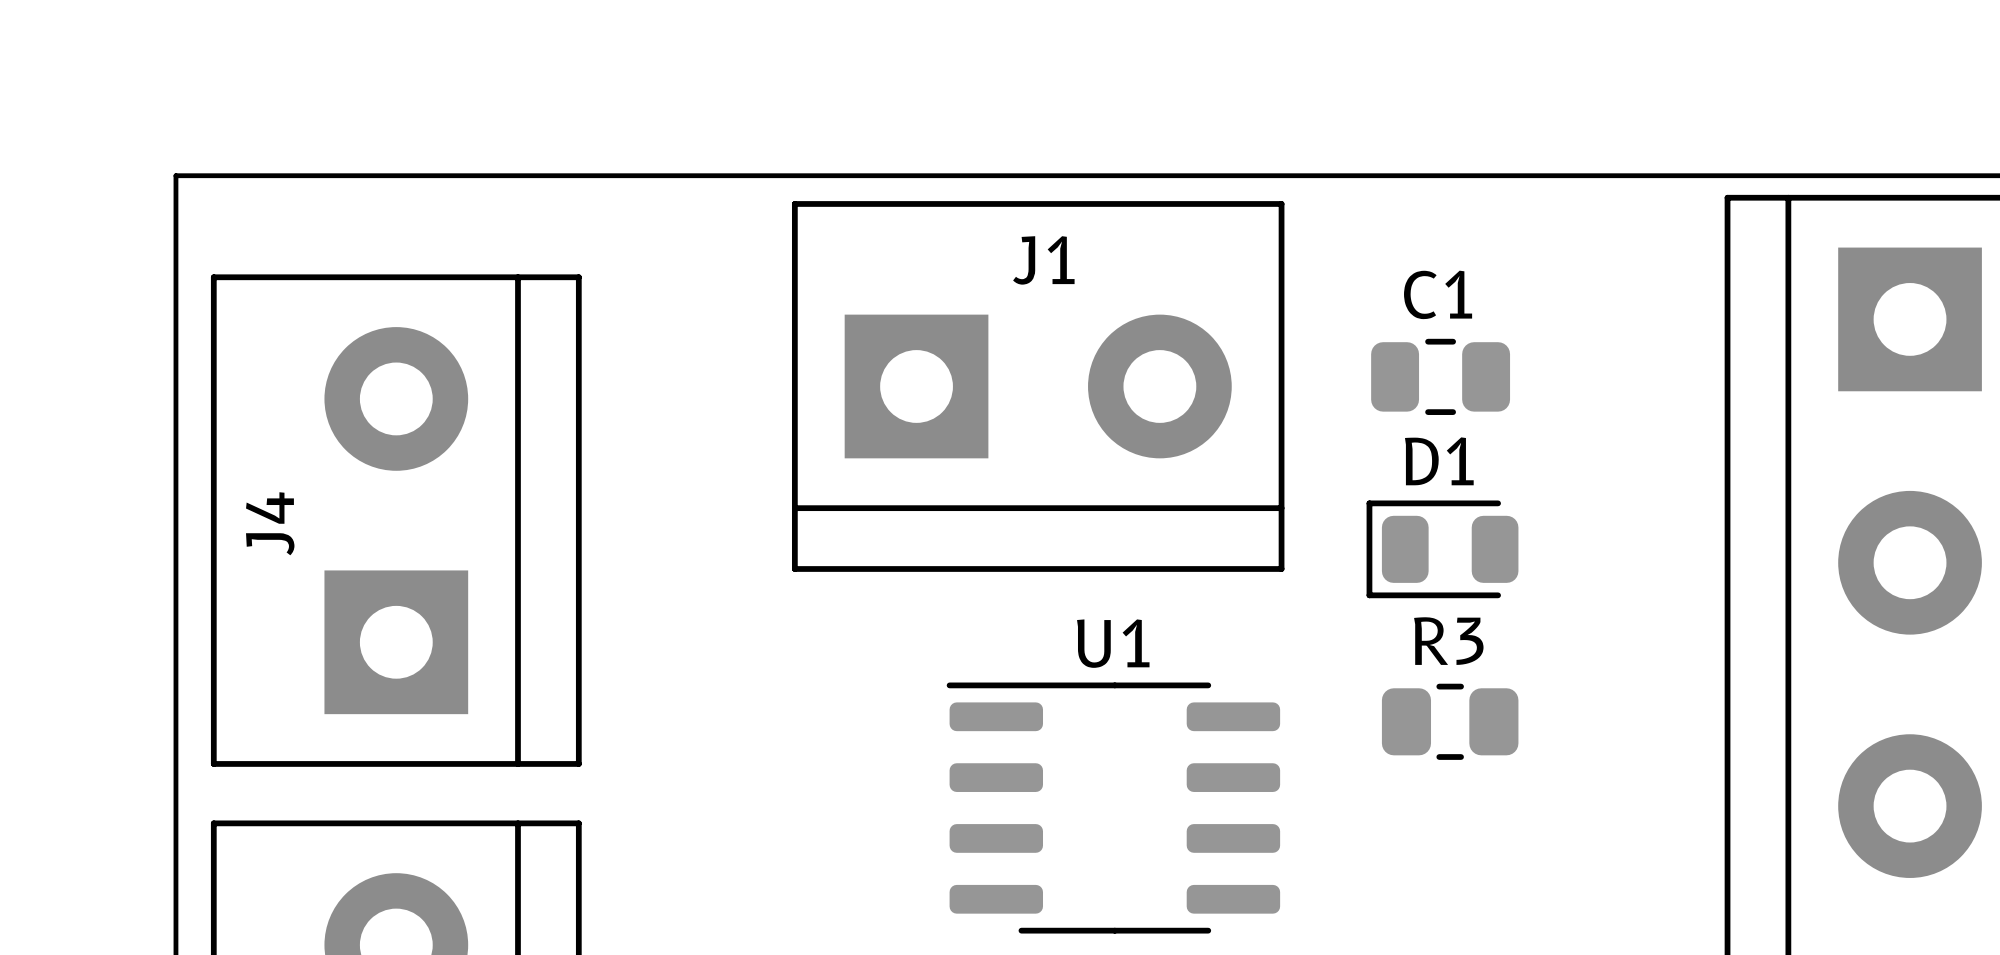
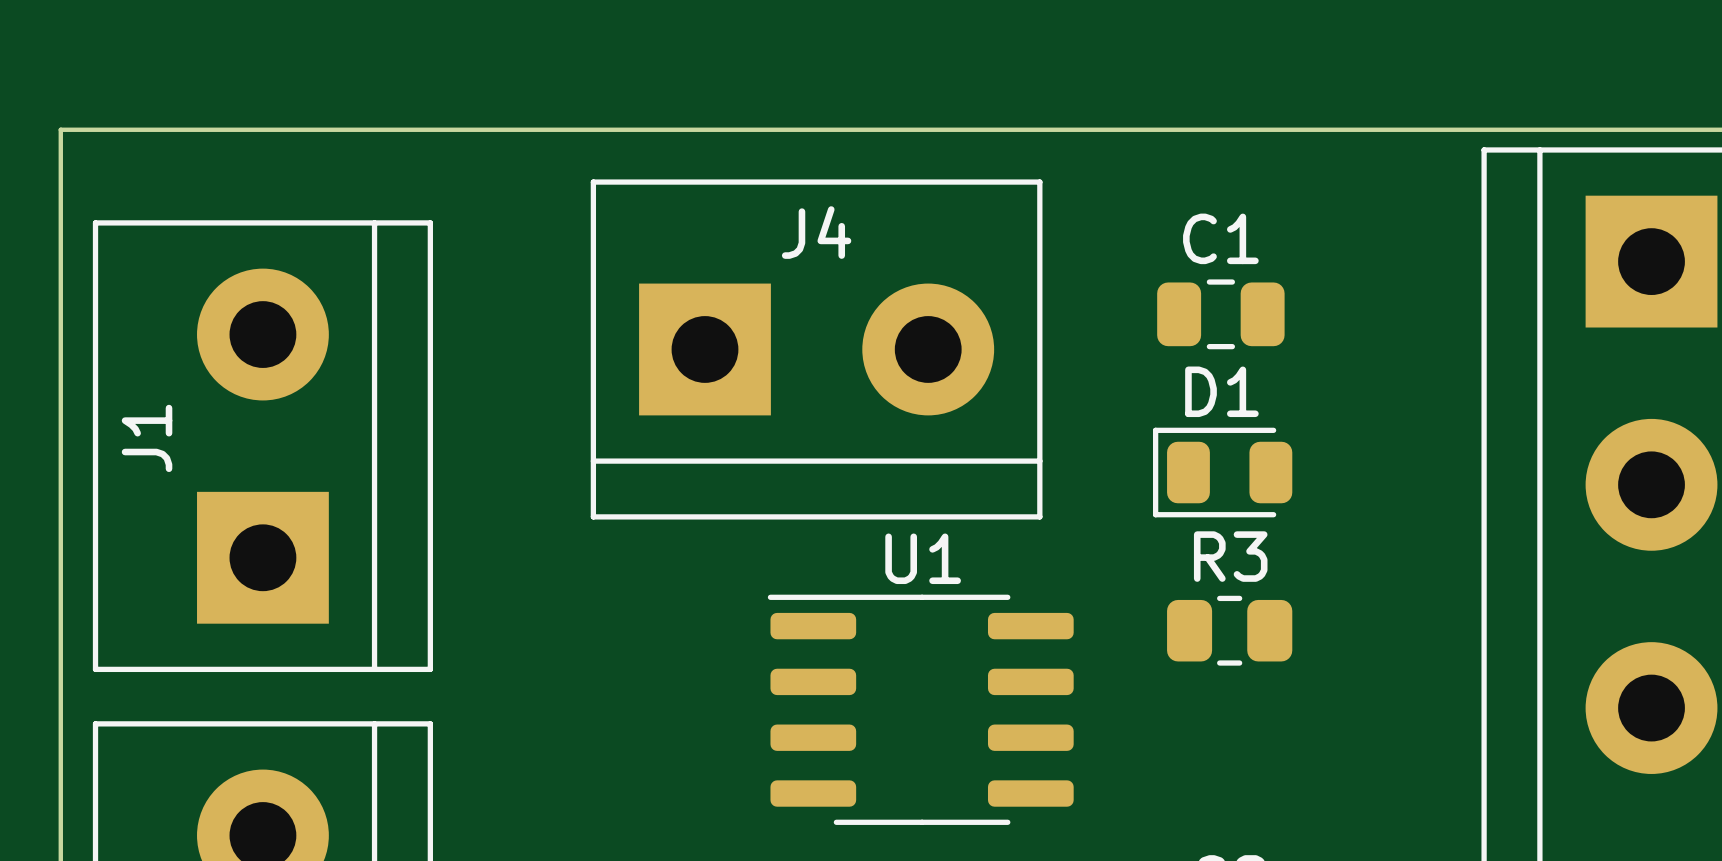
J1: (1038, 386) -> none
J4: none -> (816, 349)
J4 name: J4 (270, 523) -> J1 (147, 438)

